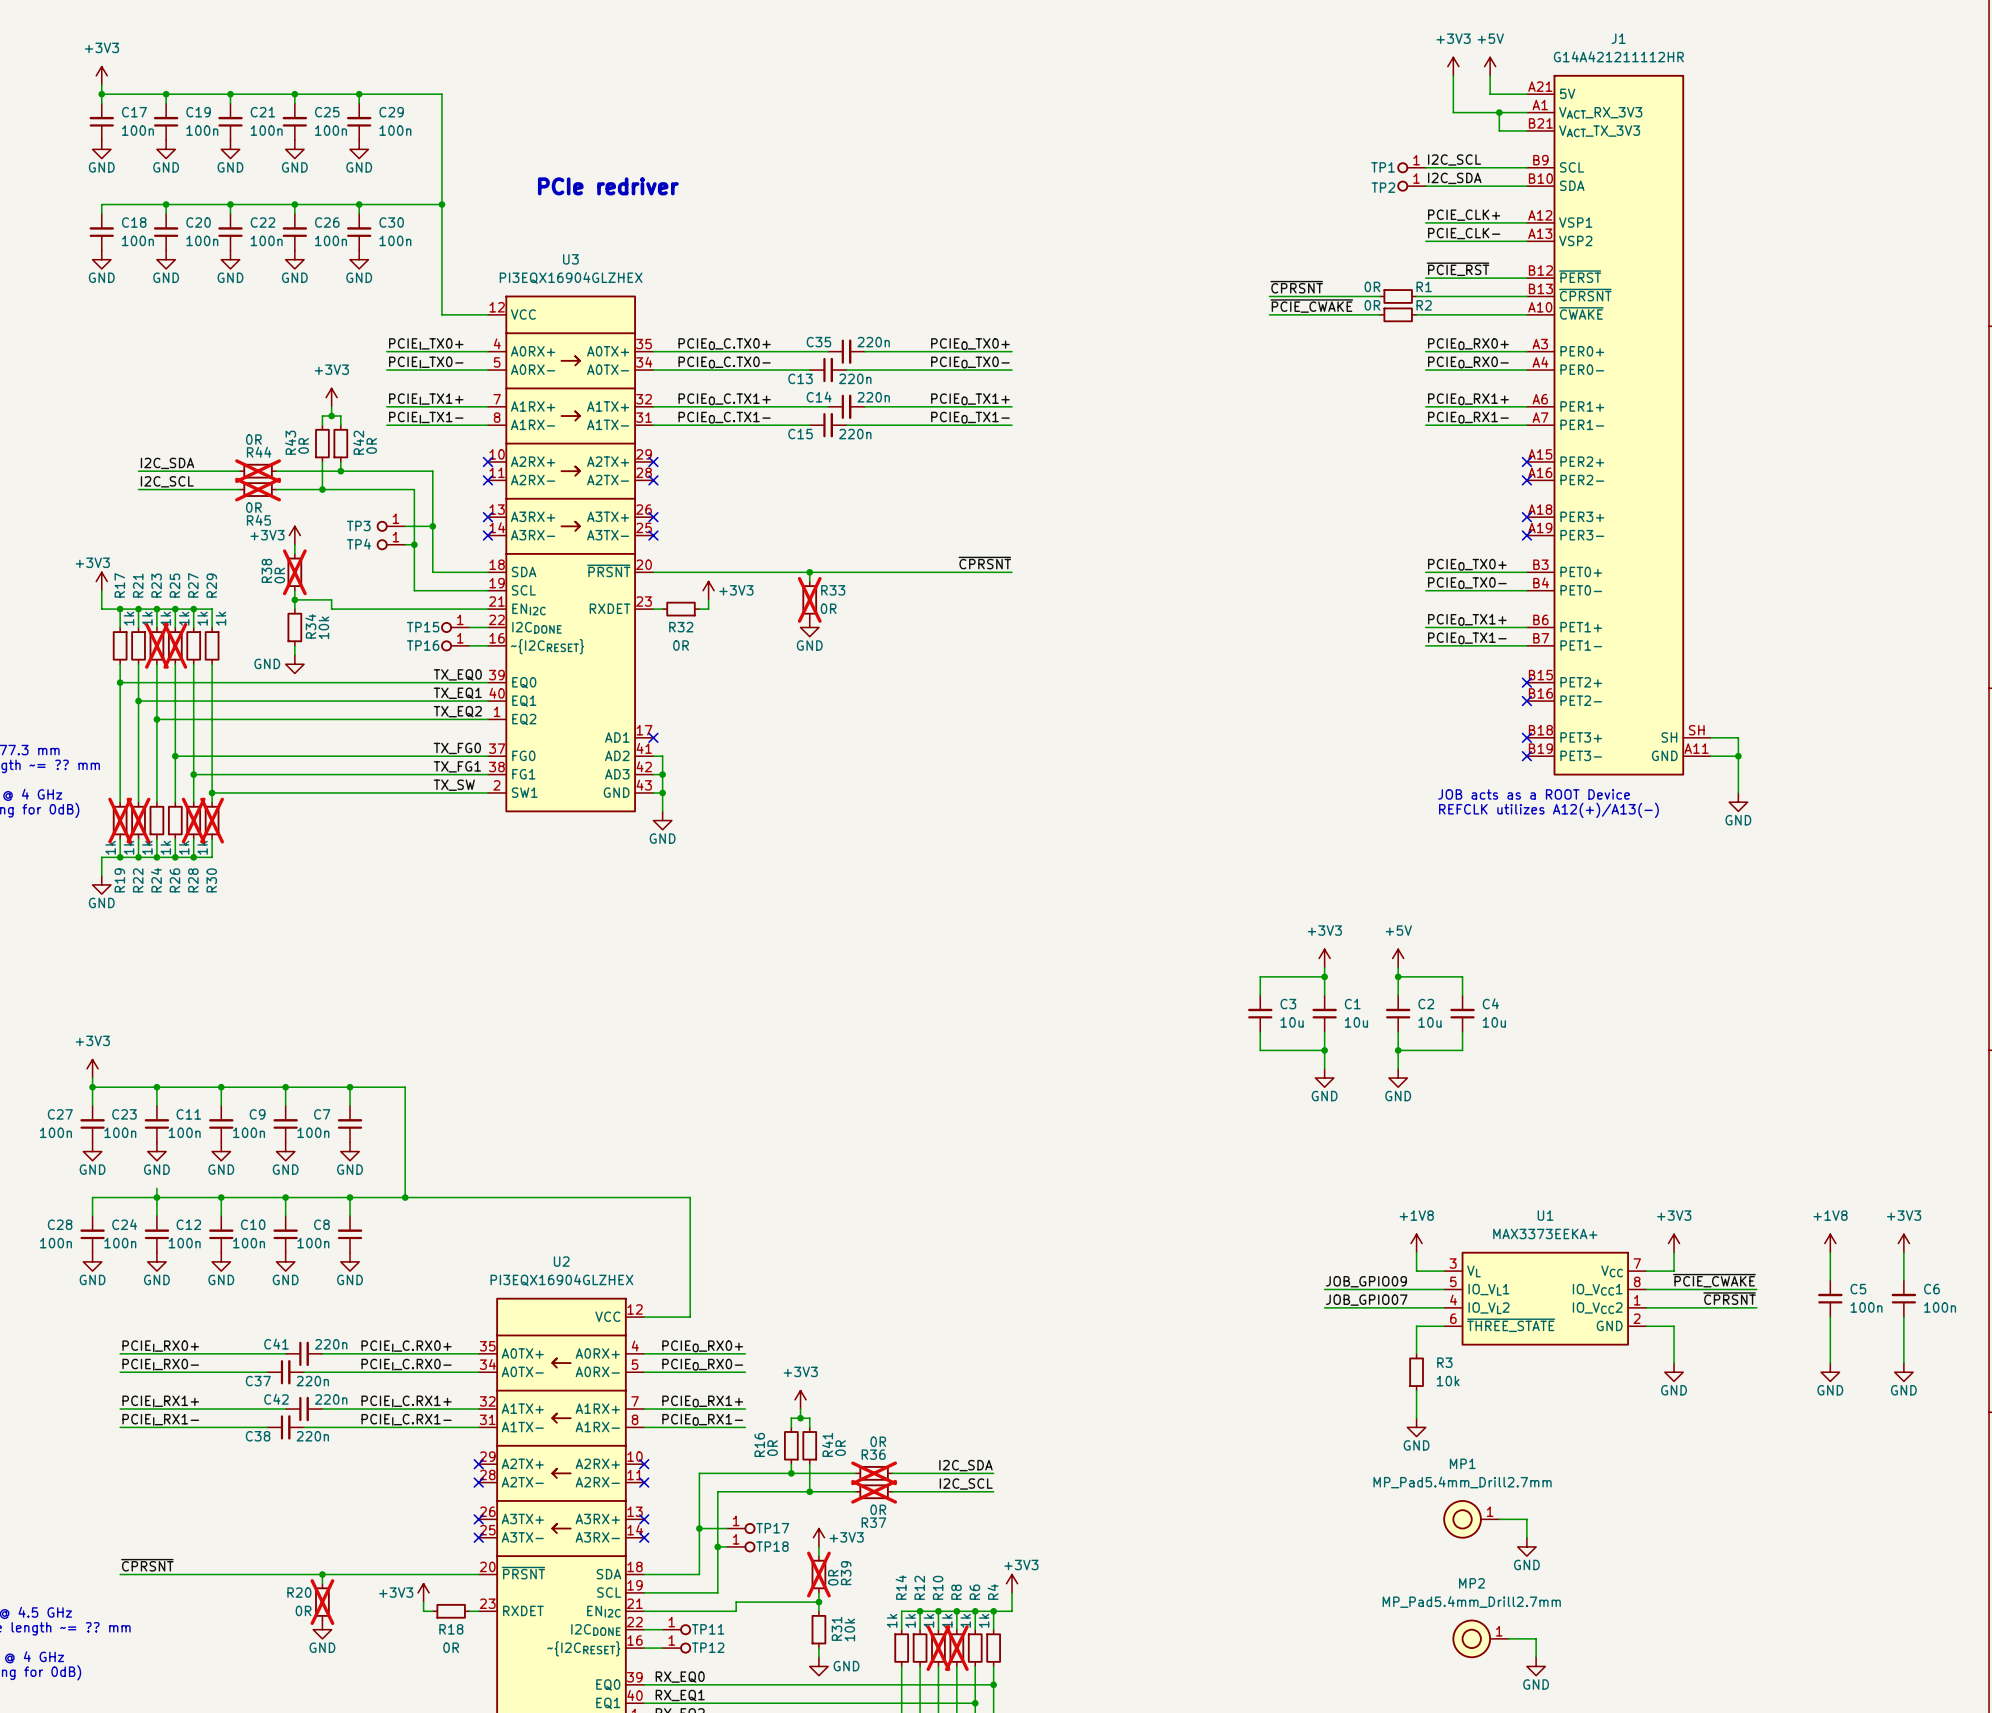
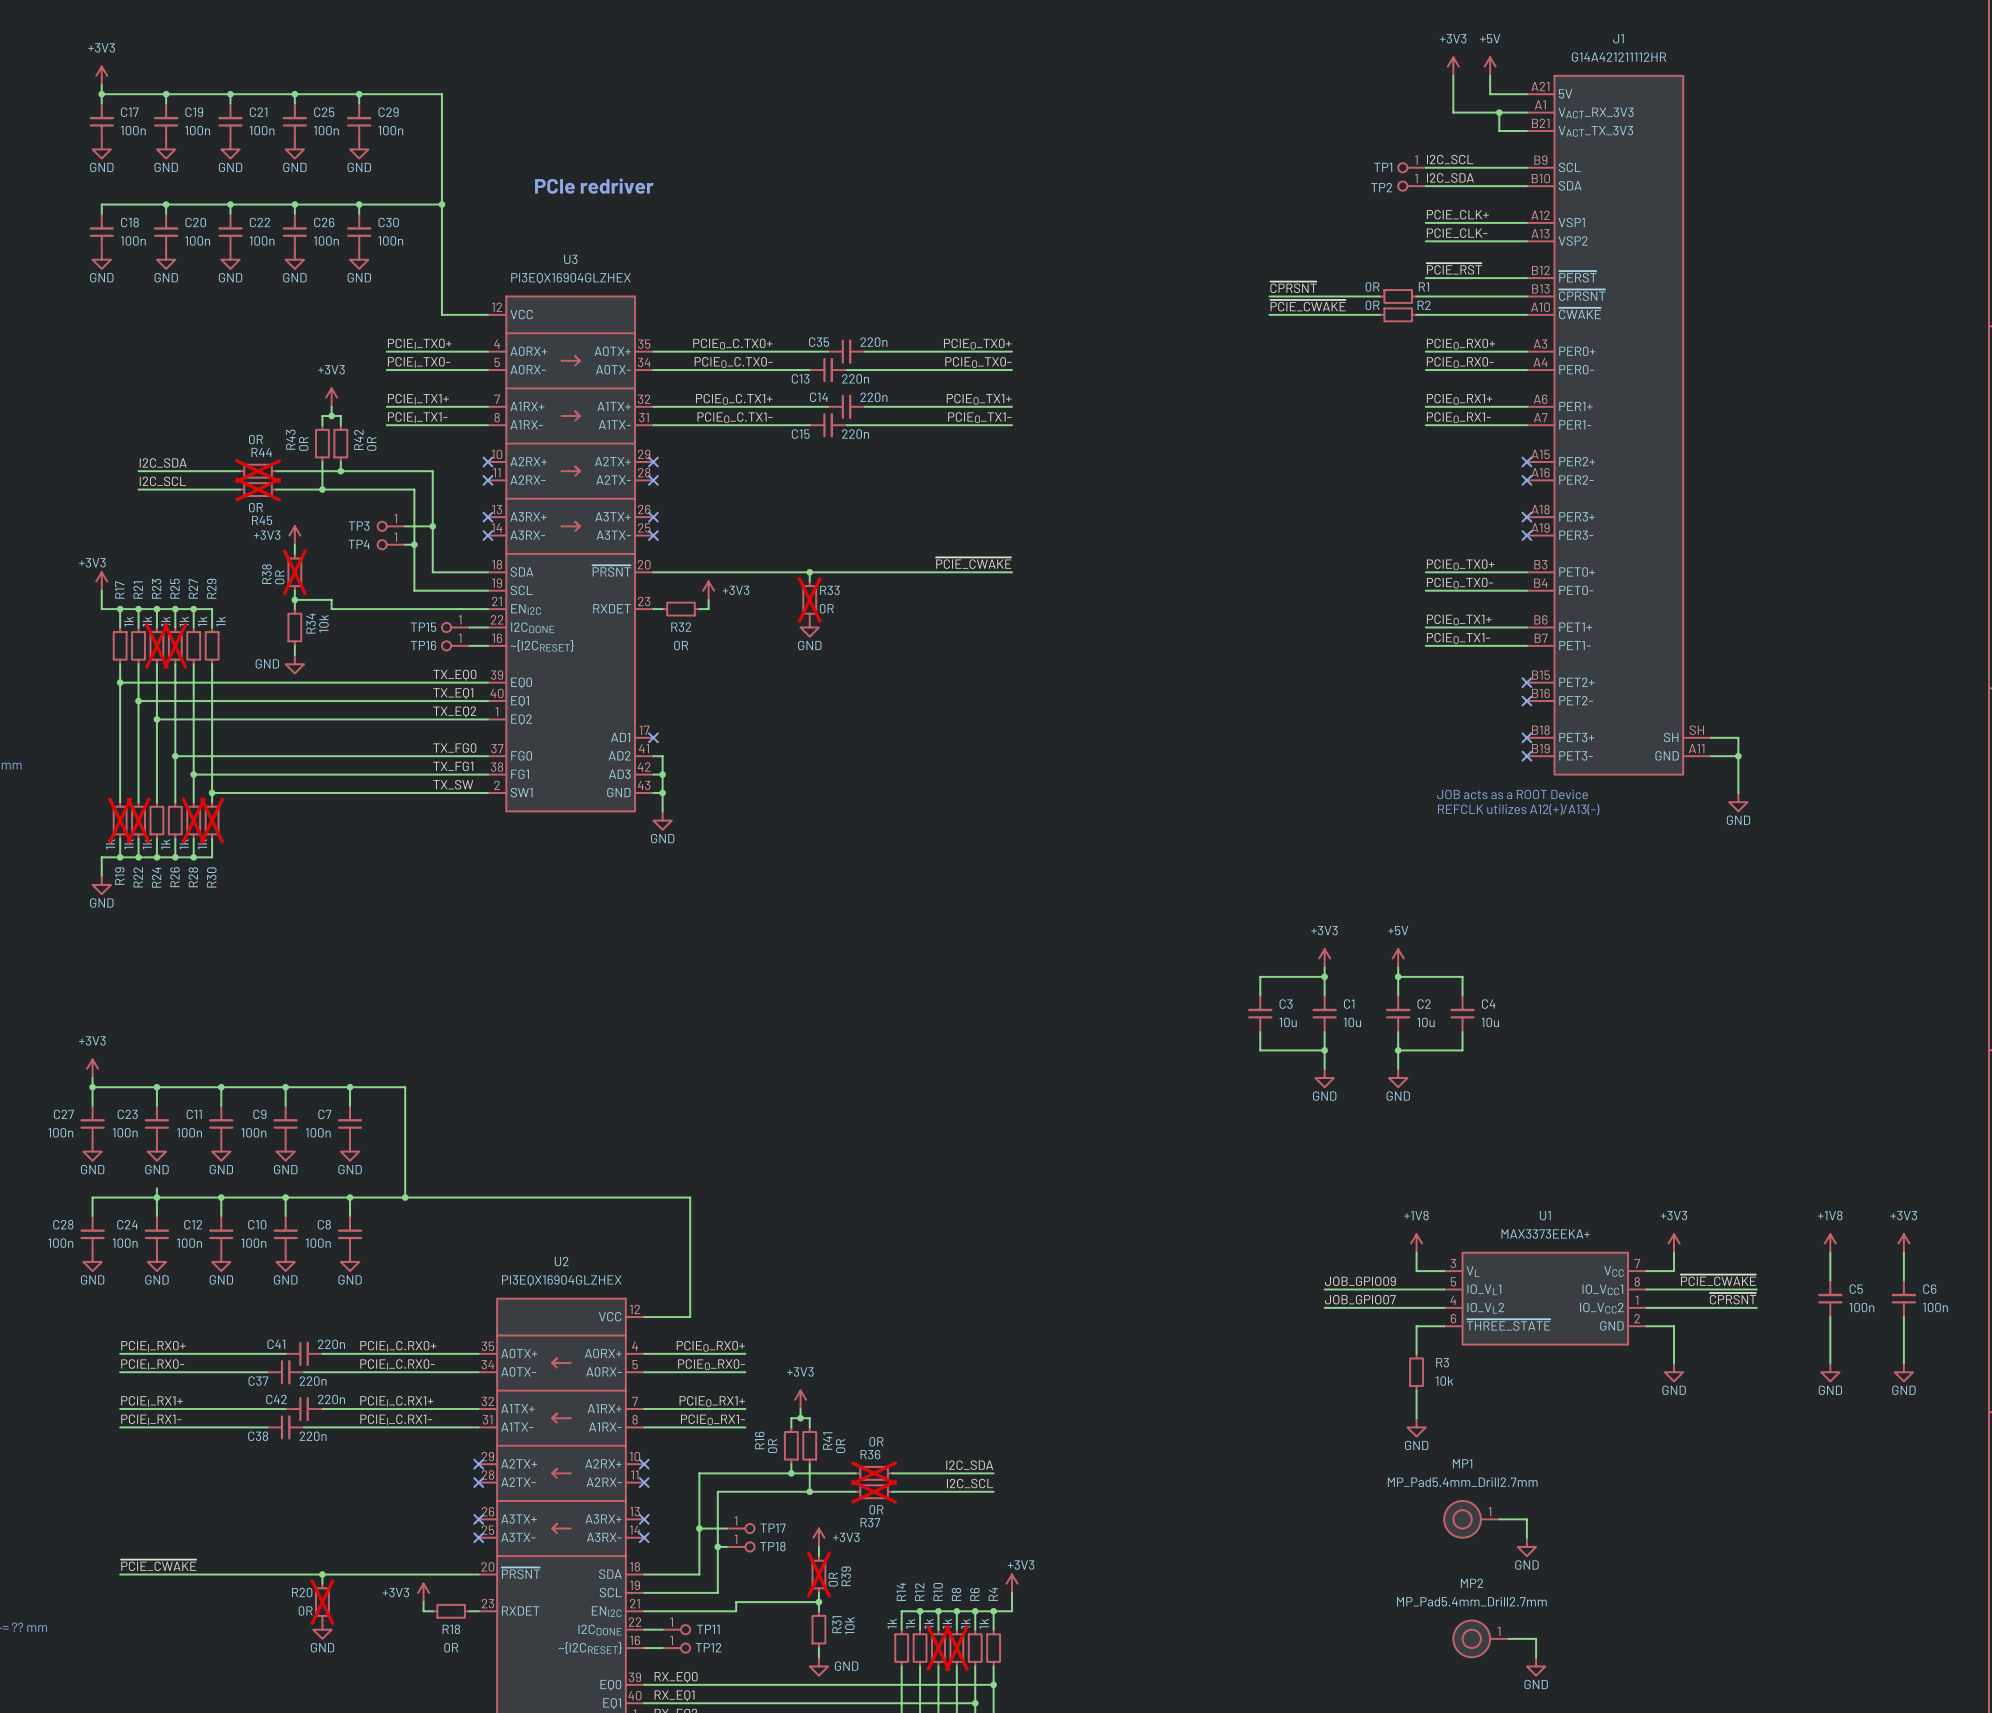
label: ~{CPRSNT} (984, 563) -> ~{PCIE_CWAKE} (973, 563)
label: ~{CPRSNT} (147, 1565) -> ~{PCIE_CWAKE} (158, 1565)

